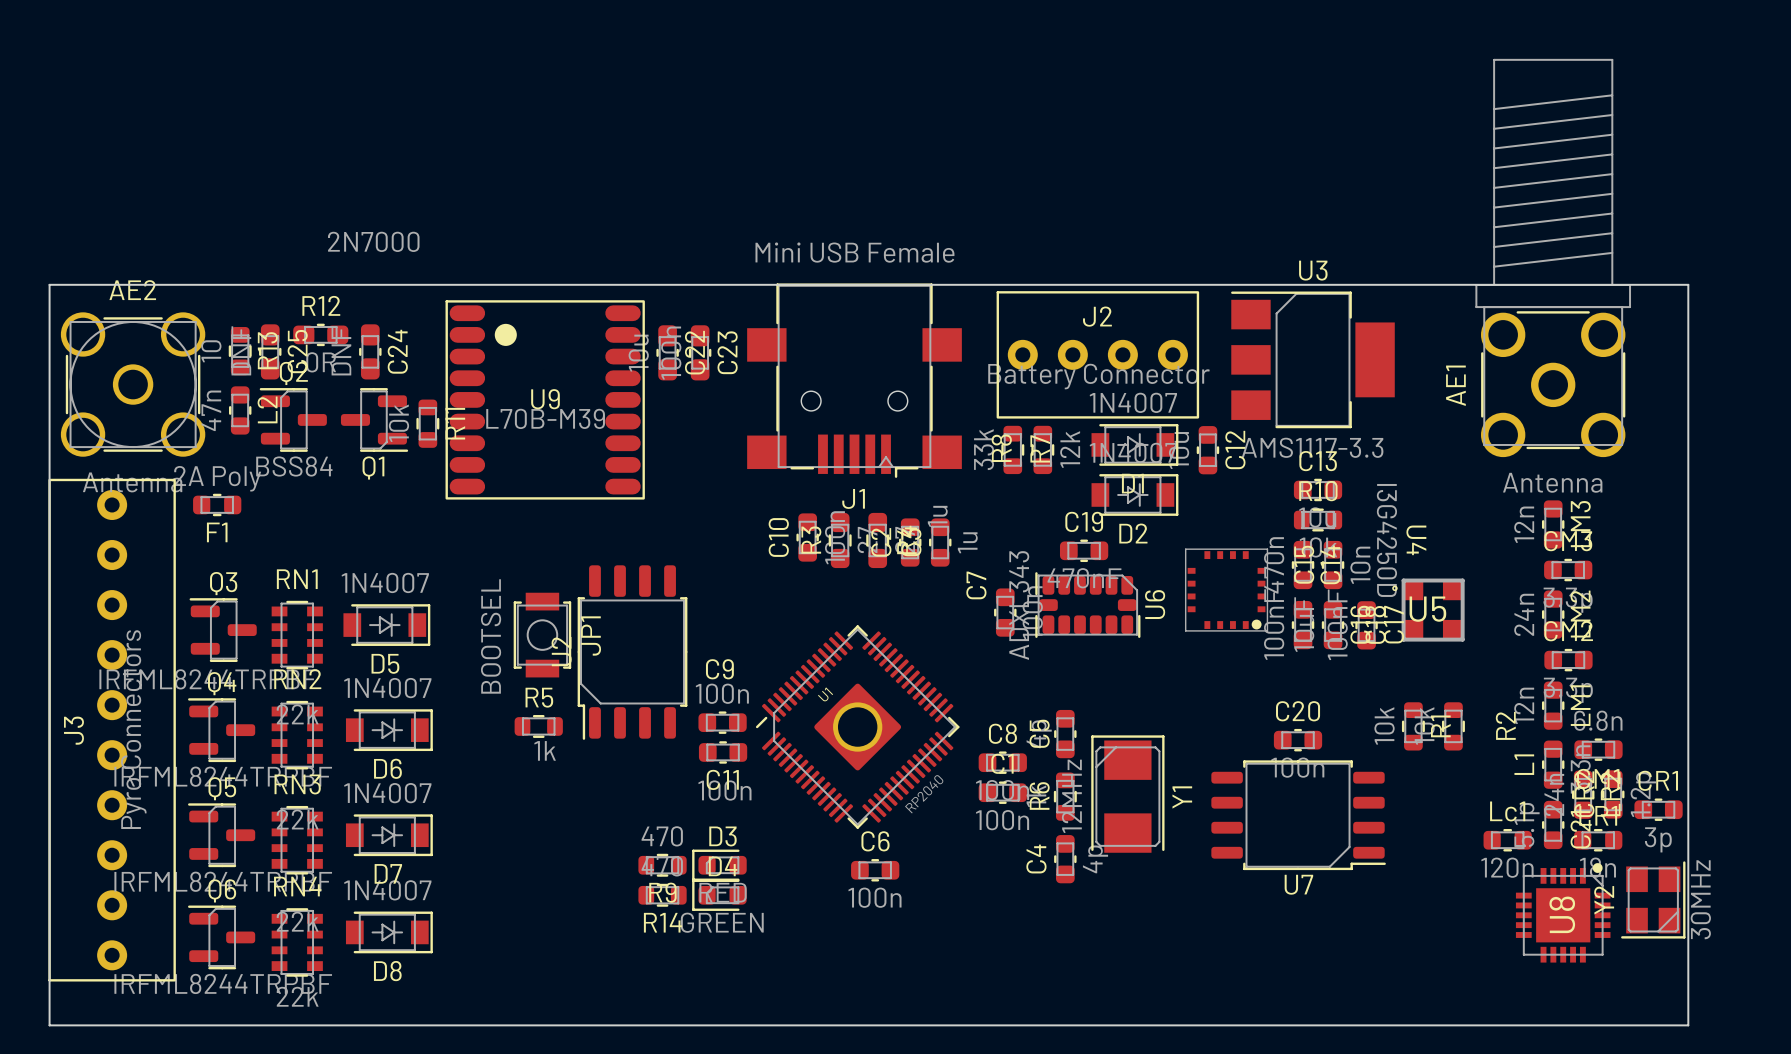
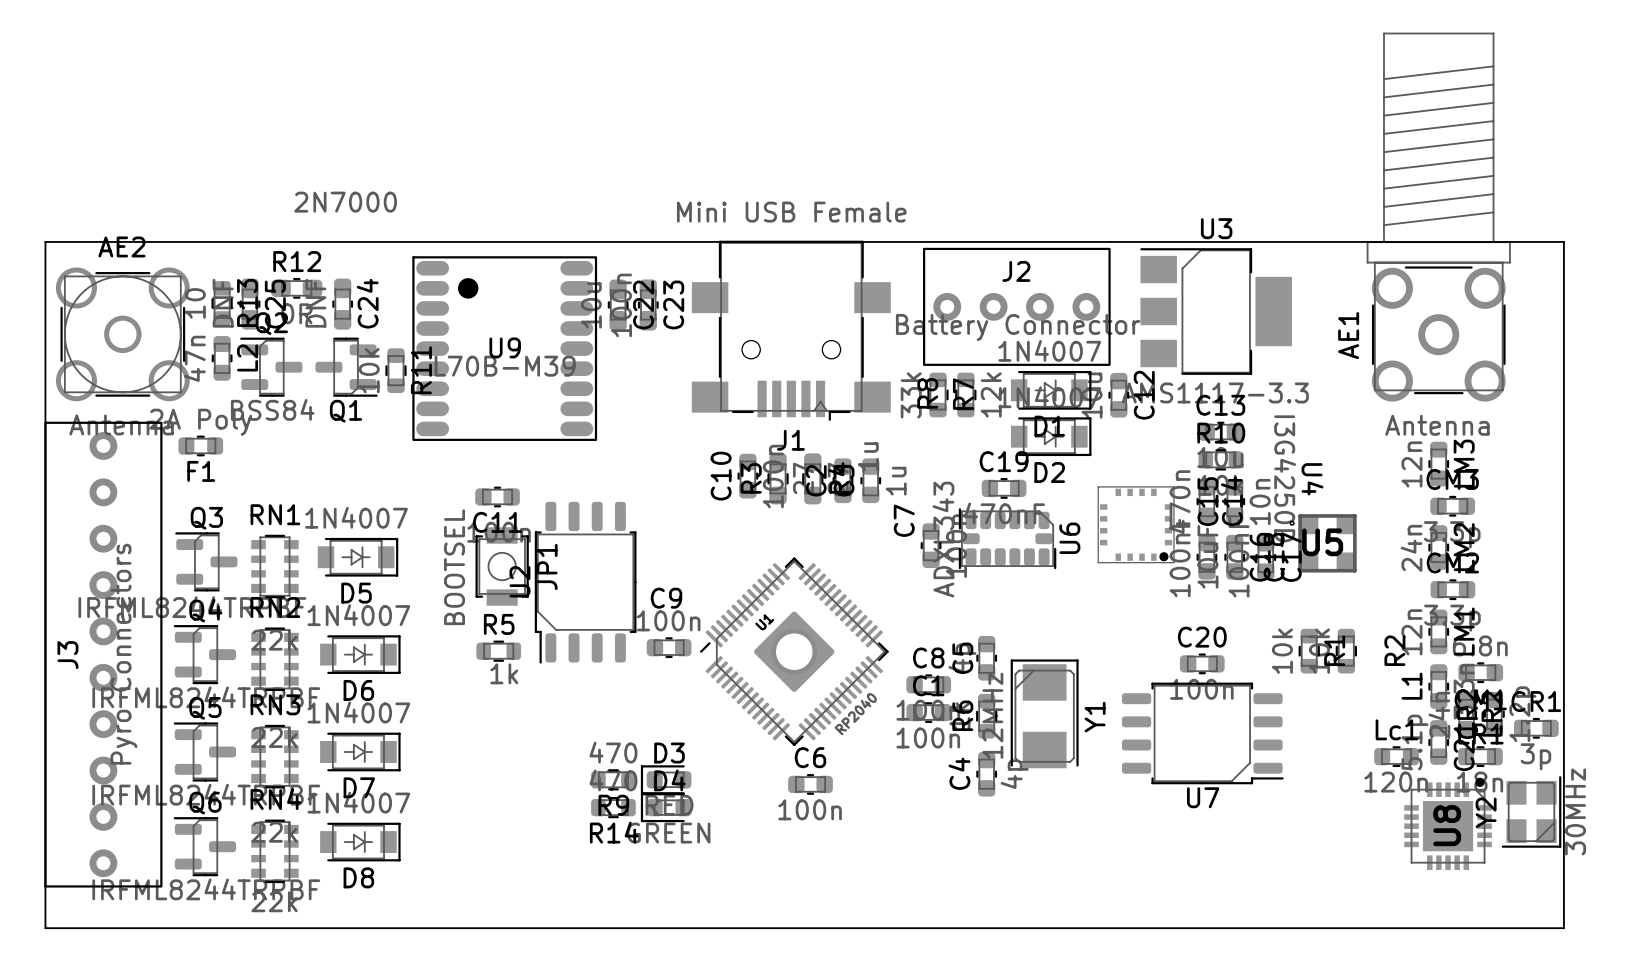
C11 position: (723, 752) -> (497, 496)

